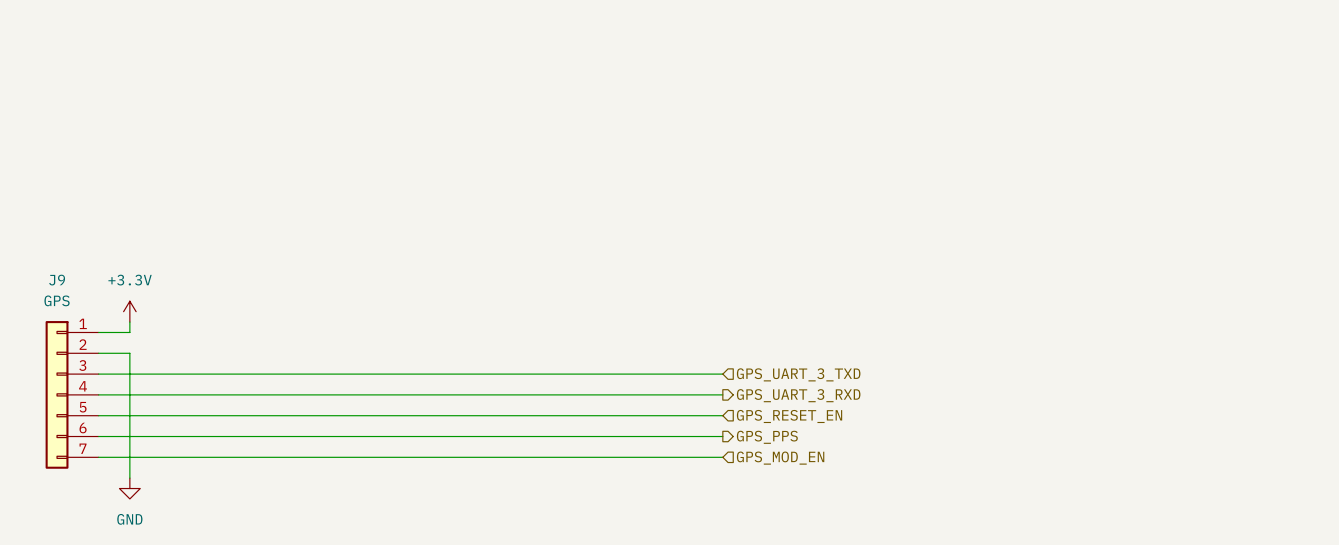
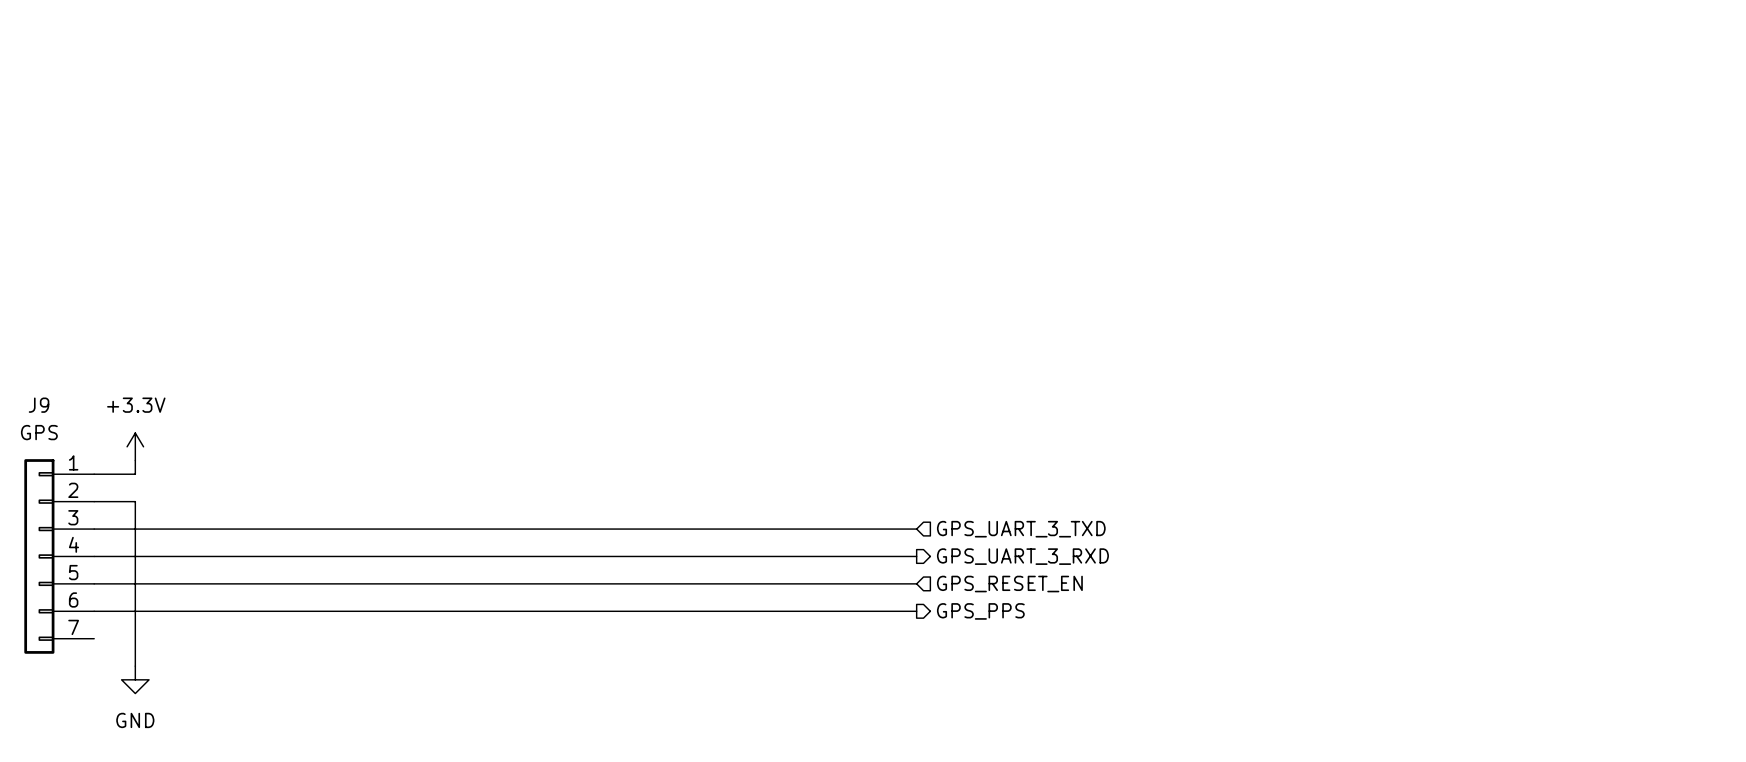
wire: (98, 457) (722, 457) -> none
hierarchical label: GPS_MOD_EN (780, 458) -> none

